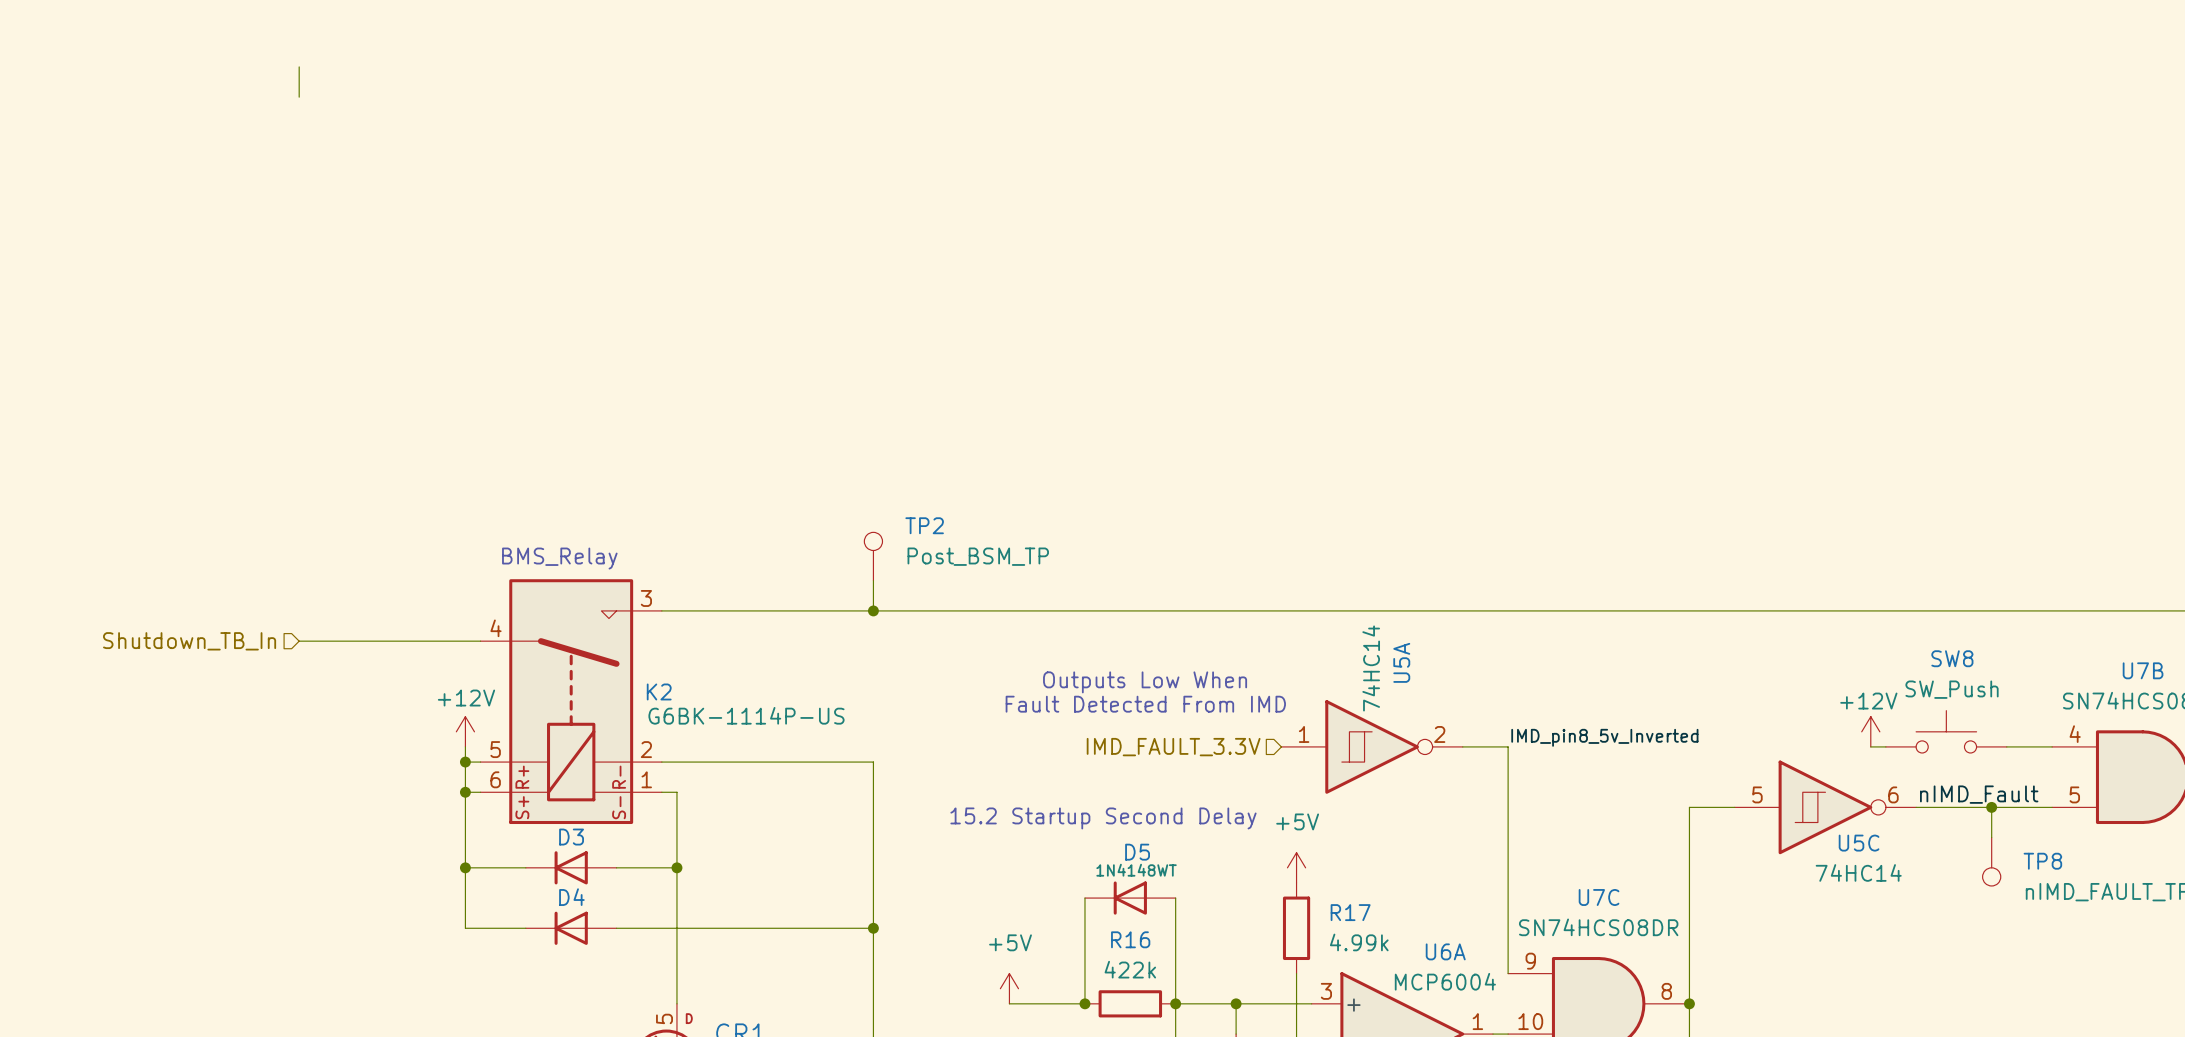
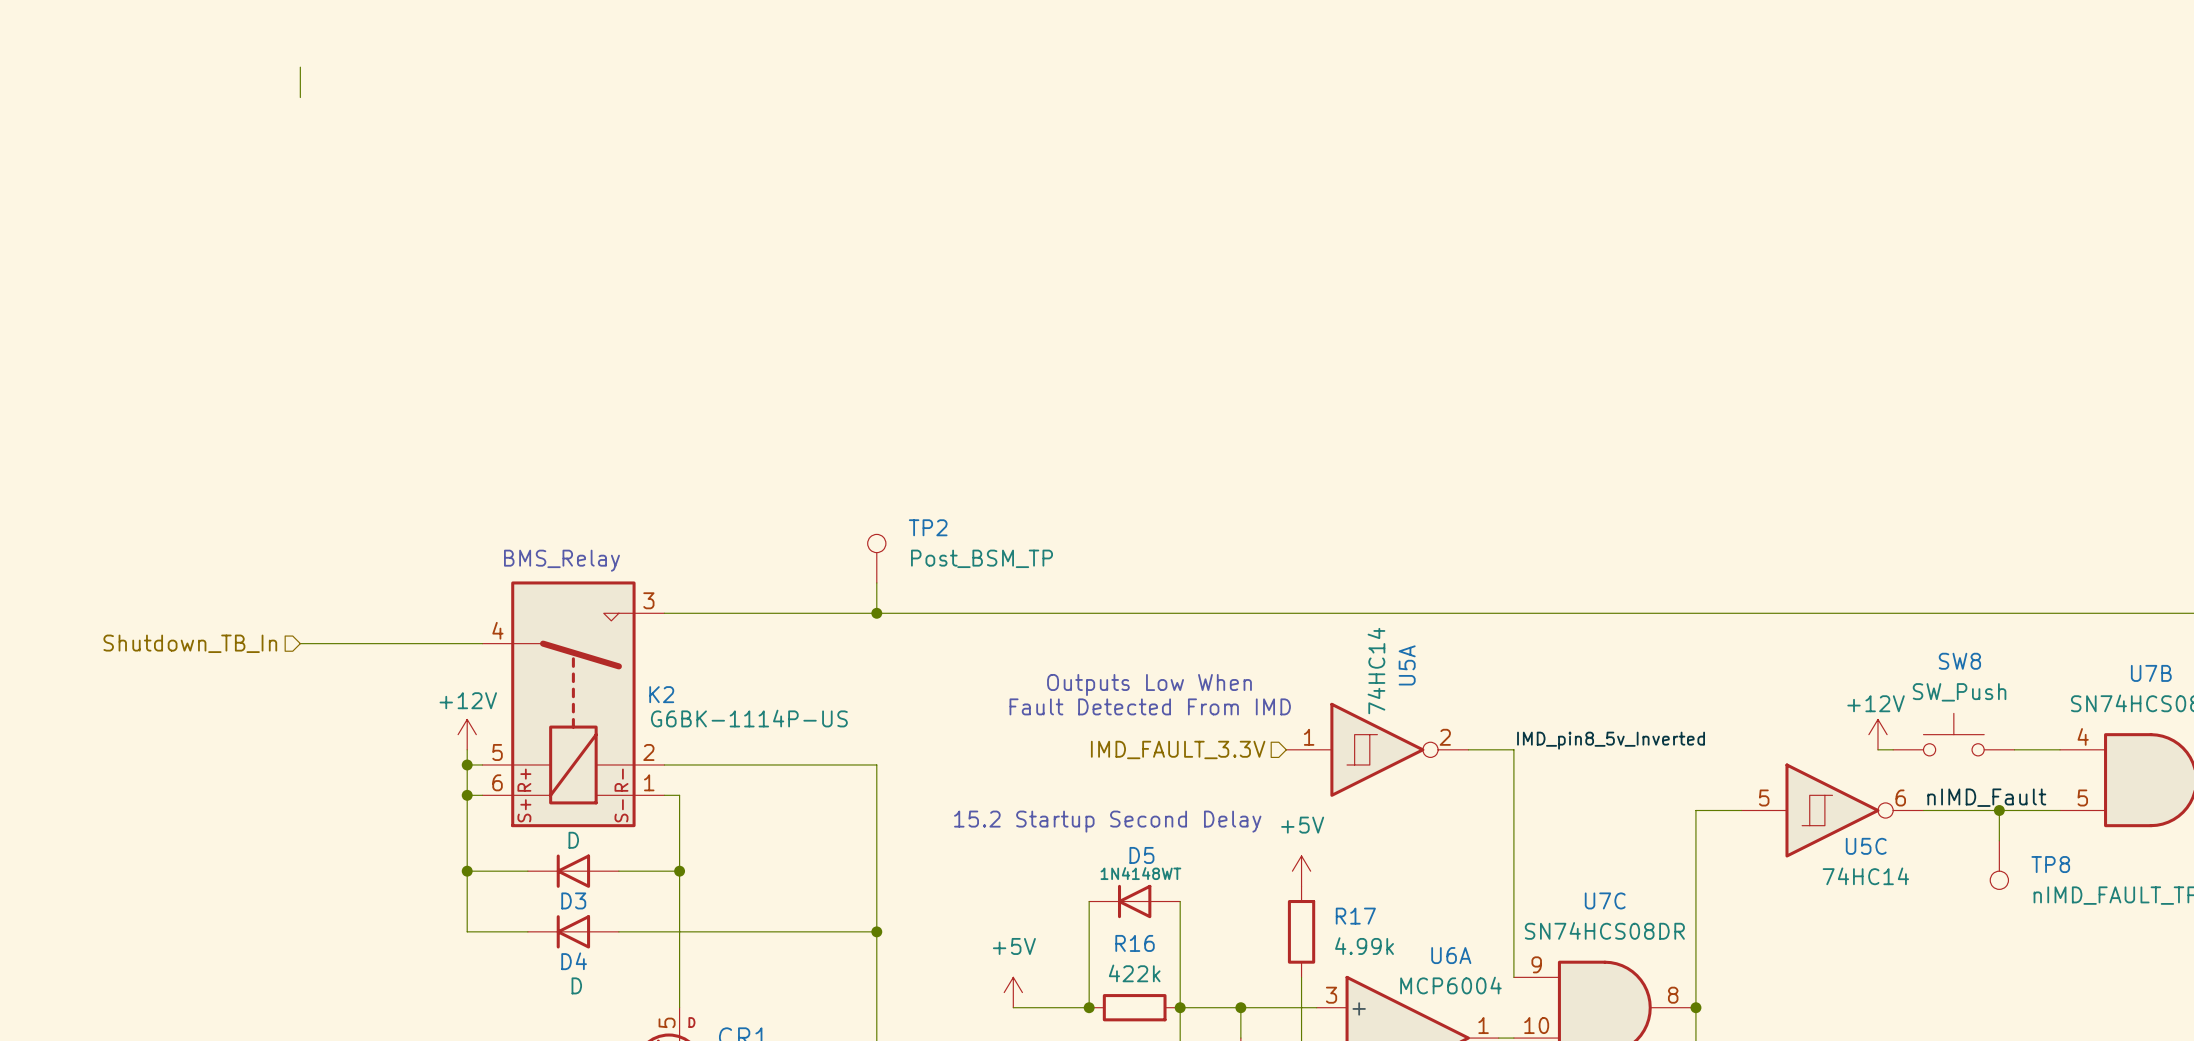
D3 name position: D3 (571, 837) -> D3 (573, 900)
D3 value: none -> D (573, 840)
D4 name position: D4 (571, 897) -> D4 (574, 961)
D4 value: none -> D (576, 985)

